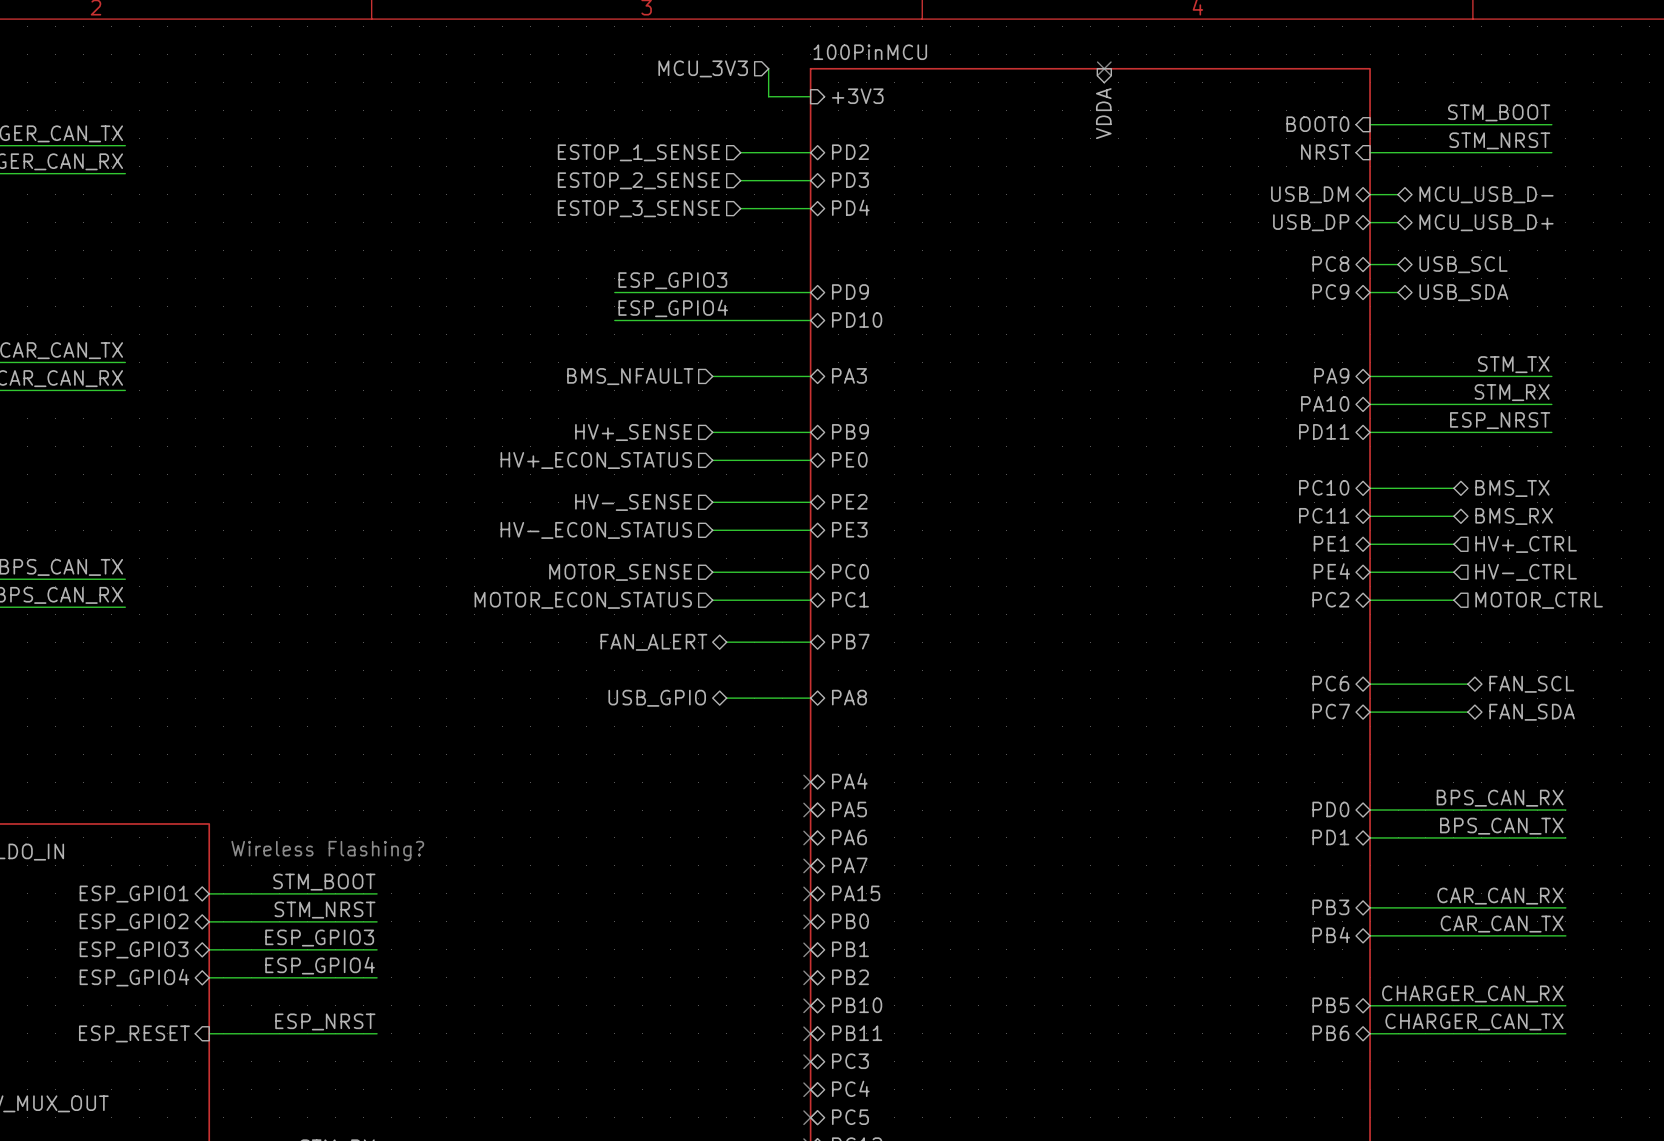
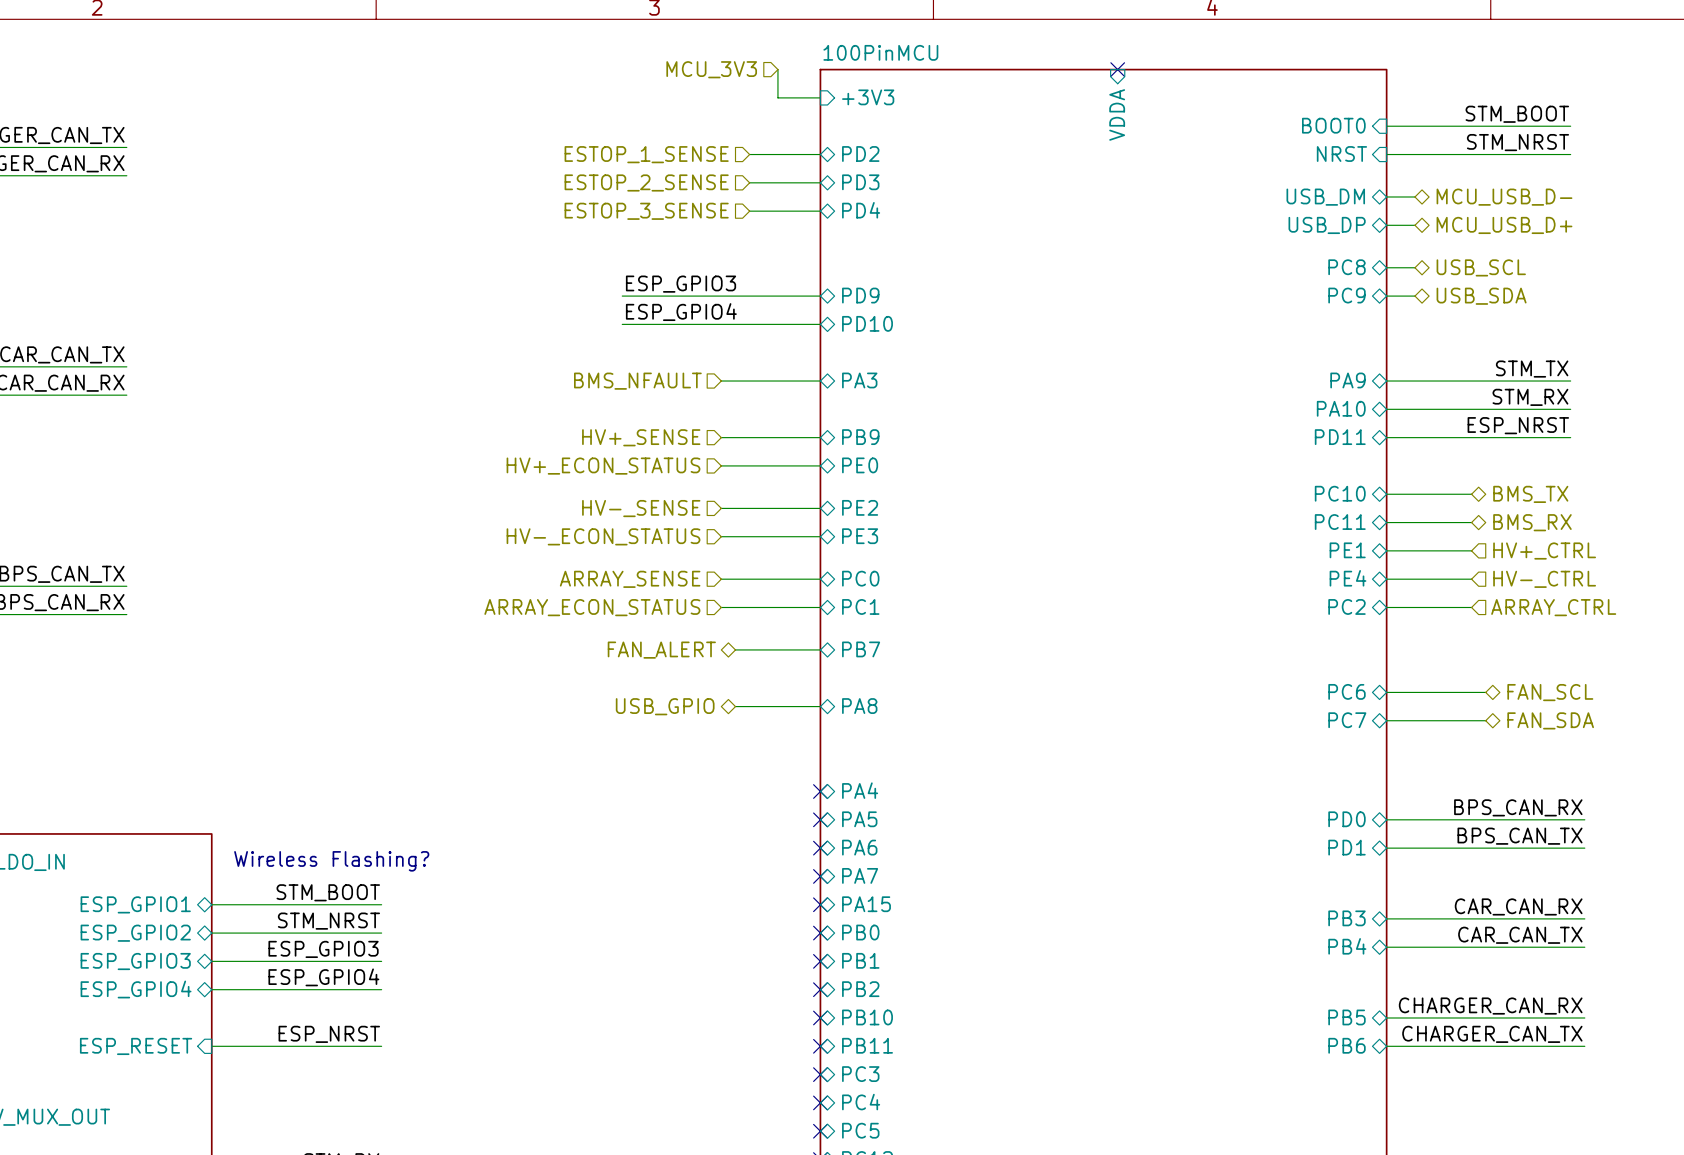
hierarchical label: MOTOR_SENSE (620, 572) -> ARRAY_SENSE (630, 579)
hierarchical label: MOTOR_ECON_STATUS (583, 600) -> ARRAY_ECON_STATUS (592, 607)
hierarchical label: MOTOR_CTRL (1539, 600) -> ARRAY_CTRL (1553, 607)

